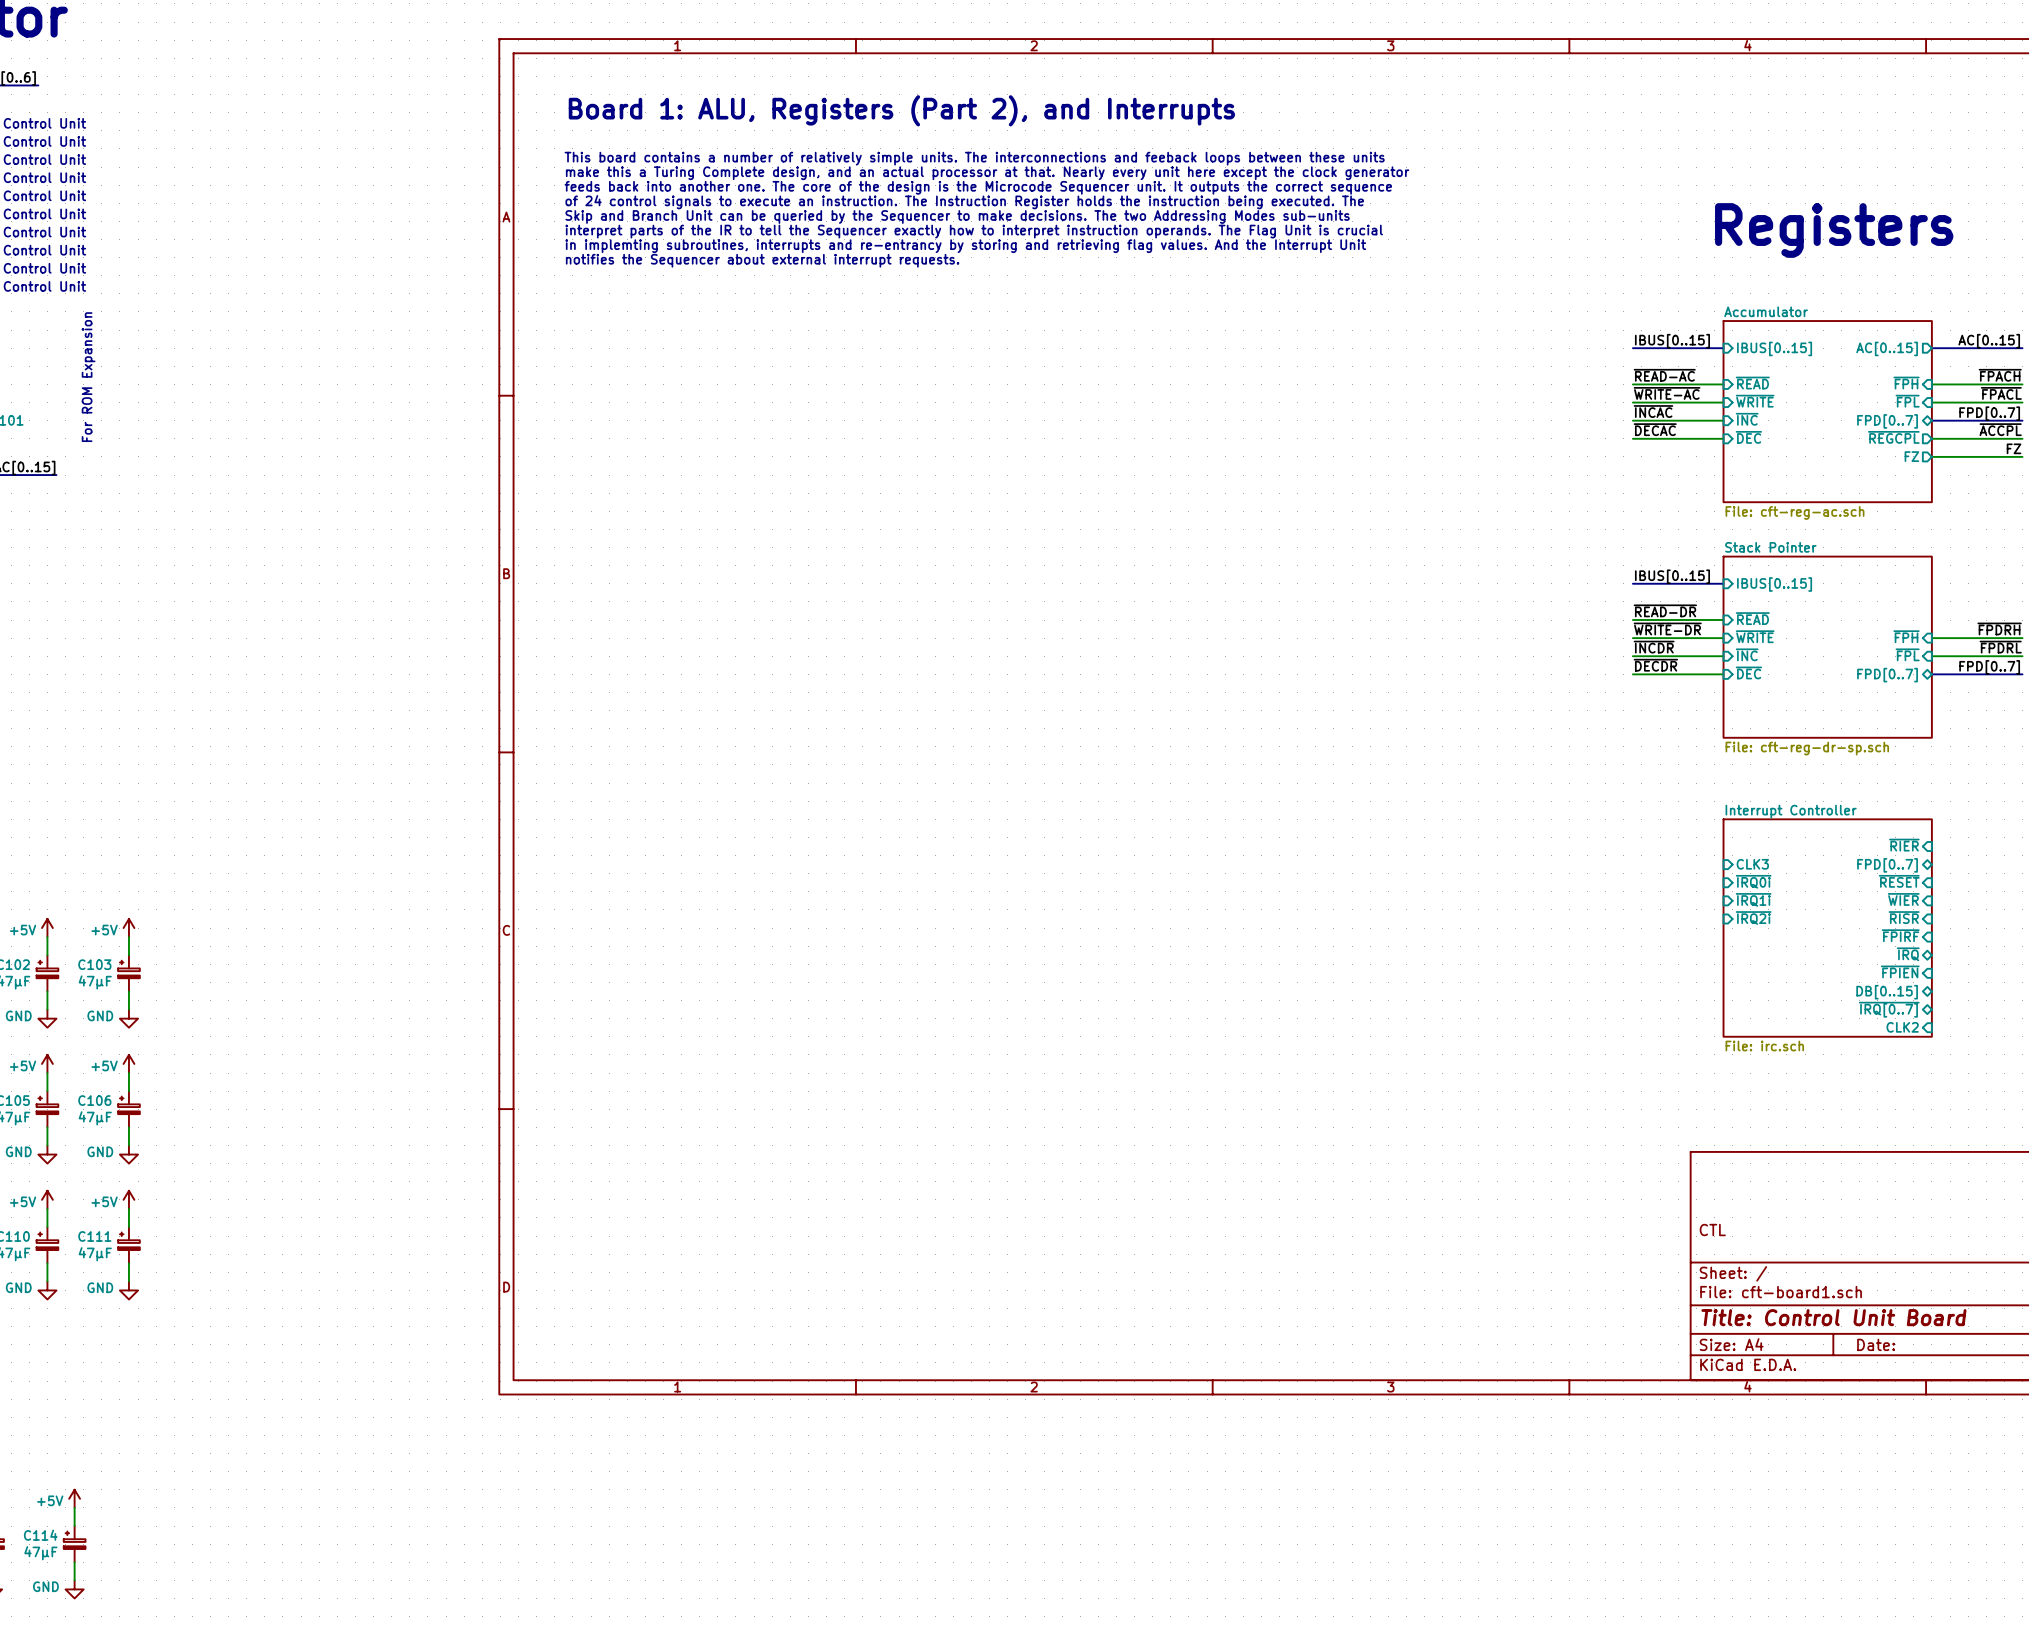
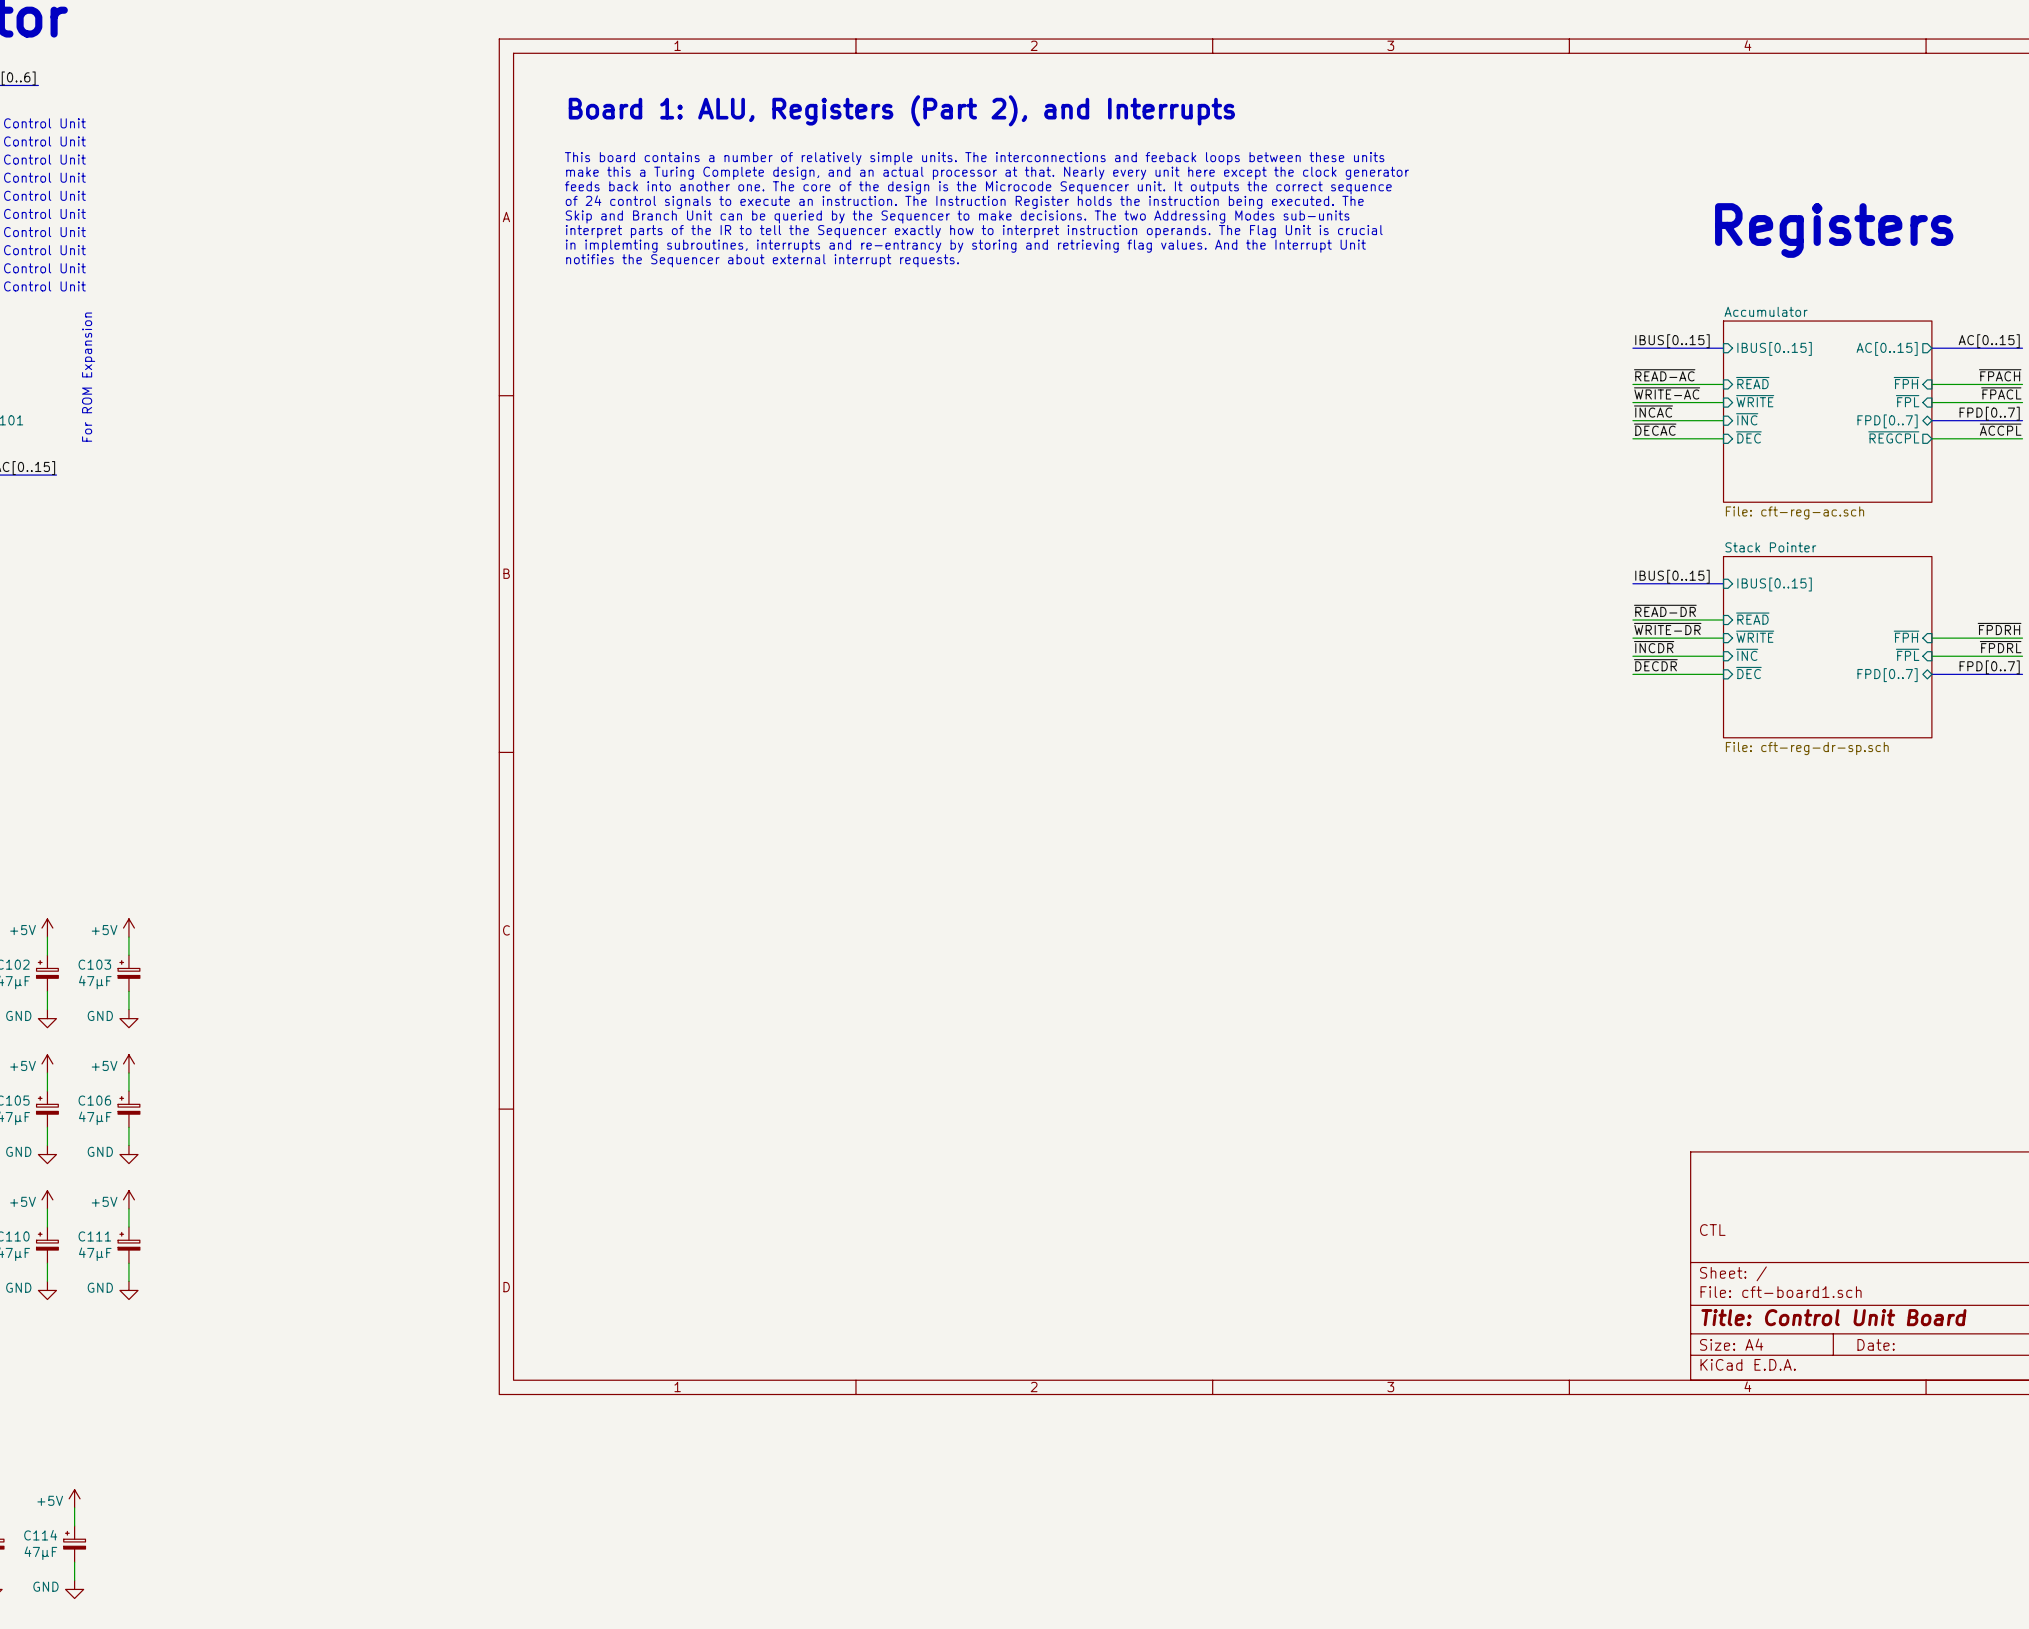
label: FZ (2014, 448) -> none
sheet pin: FZ (1911, 456) -> none
wire: (1931, 456) (2022, 456) -> none
sheet pin: ~{RIER} (1904, 845) -> none
sheet pin: CLK3 (1752, 864) -> none
sheet pin: FPD[0..7] (1887, 865) -> none
sheet pin: ~{IRQ0i} (1753, 881) -> none
sheet pin: ~{RESET} (1899, 881) -> none
sheet pin: ~{IRQ1i} (1753, 899) -> none
sheet pin: ~{WIER} (1903, 899) -> none
sheet pin: ~{RISR} (1904, 917) -> none
sheet pin: ~{IRQ2i} (1753, 918) -> none
sheet Interrupt Controller: File: irc.sch (1827, 928) -> none
sheet pin: ~{FPIRF} (1900, 935) -> none
sheet pin: ~{IRQ} (1908, 954) -> none
sheet pin: ~{FPIEN} (1900, 971) -> none
sheet pin: DB[0..15] (1887, 992) -> none
sheet pin: ~{IRQ[0..7]} (1889, 1009) -> none
sheet pin: CLK2 (1902, 1027) -> none

